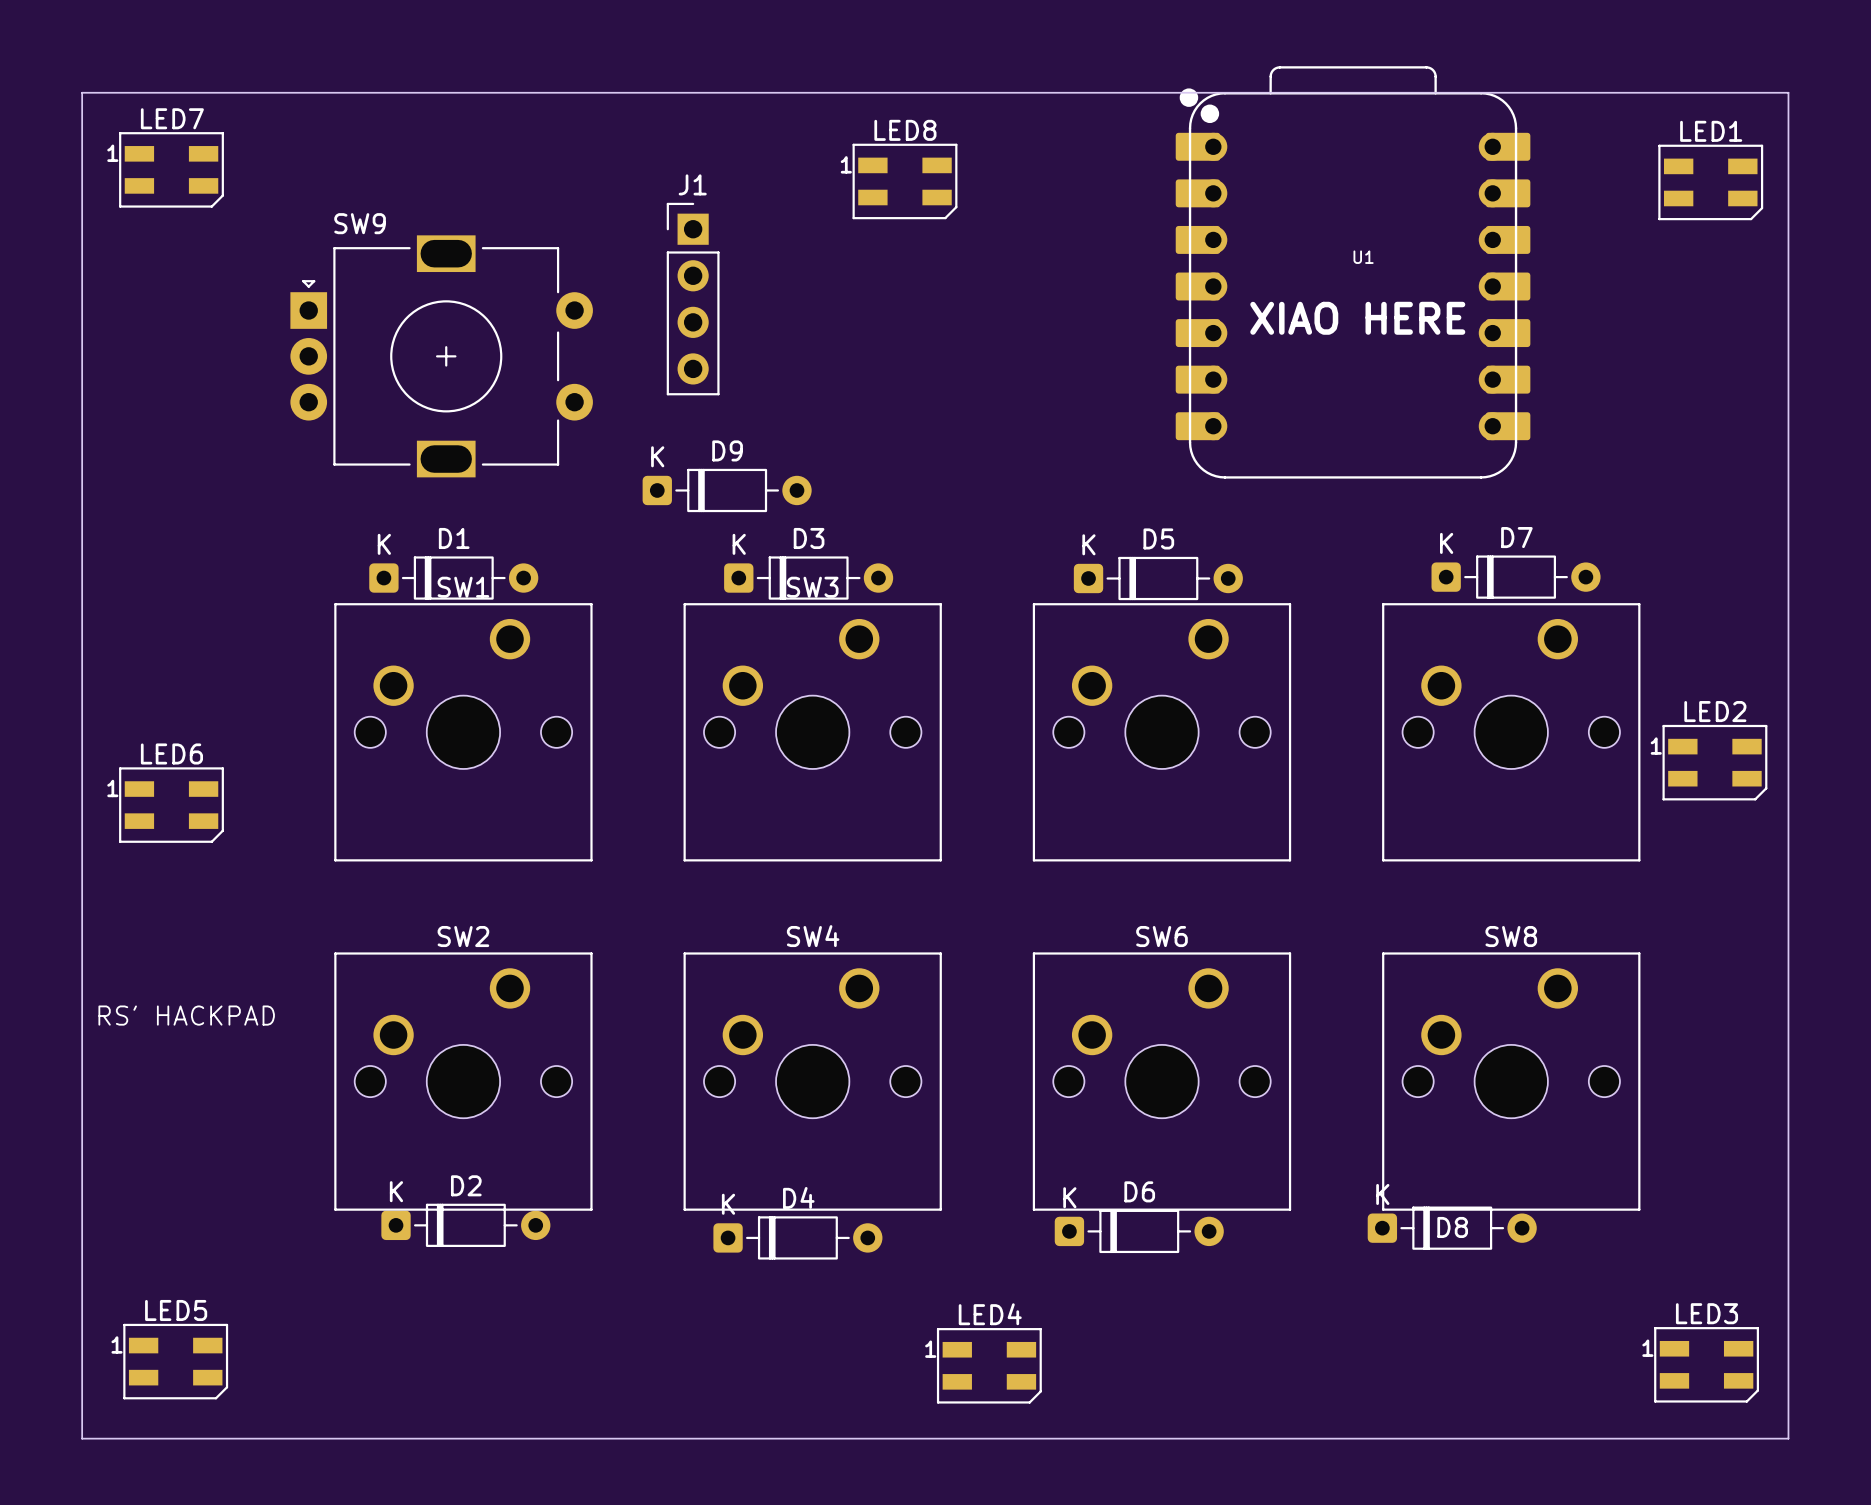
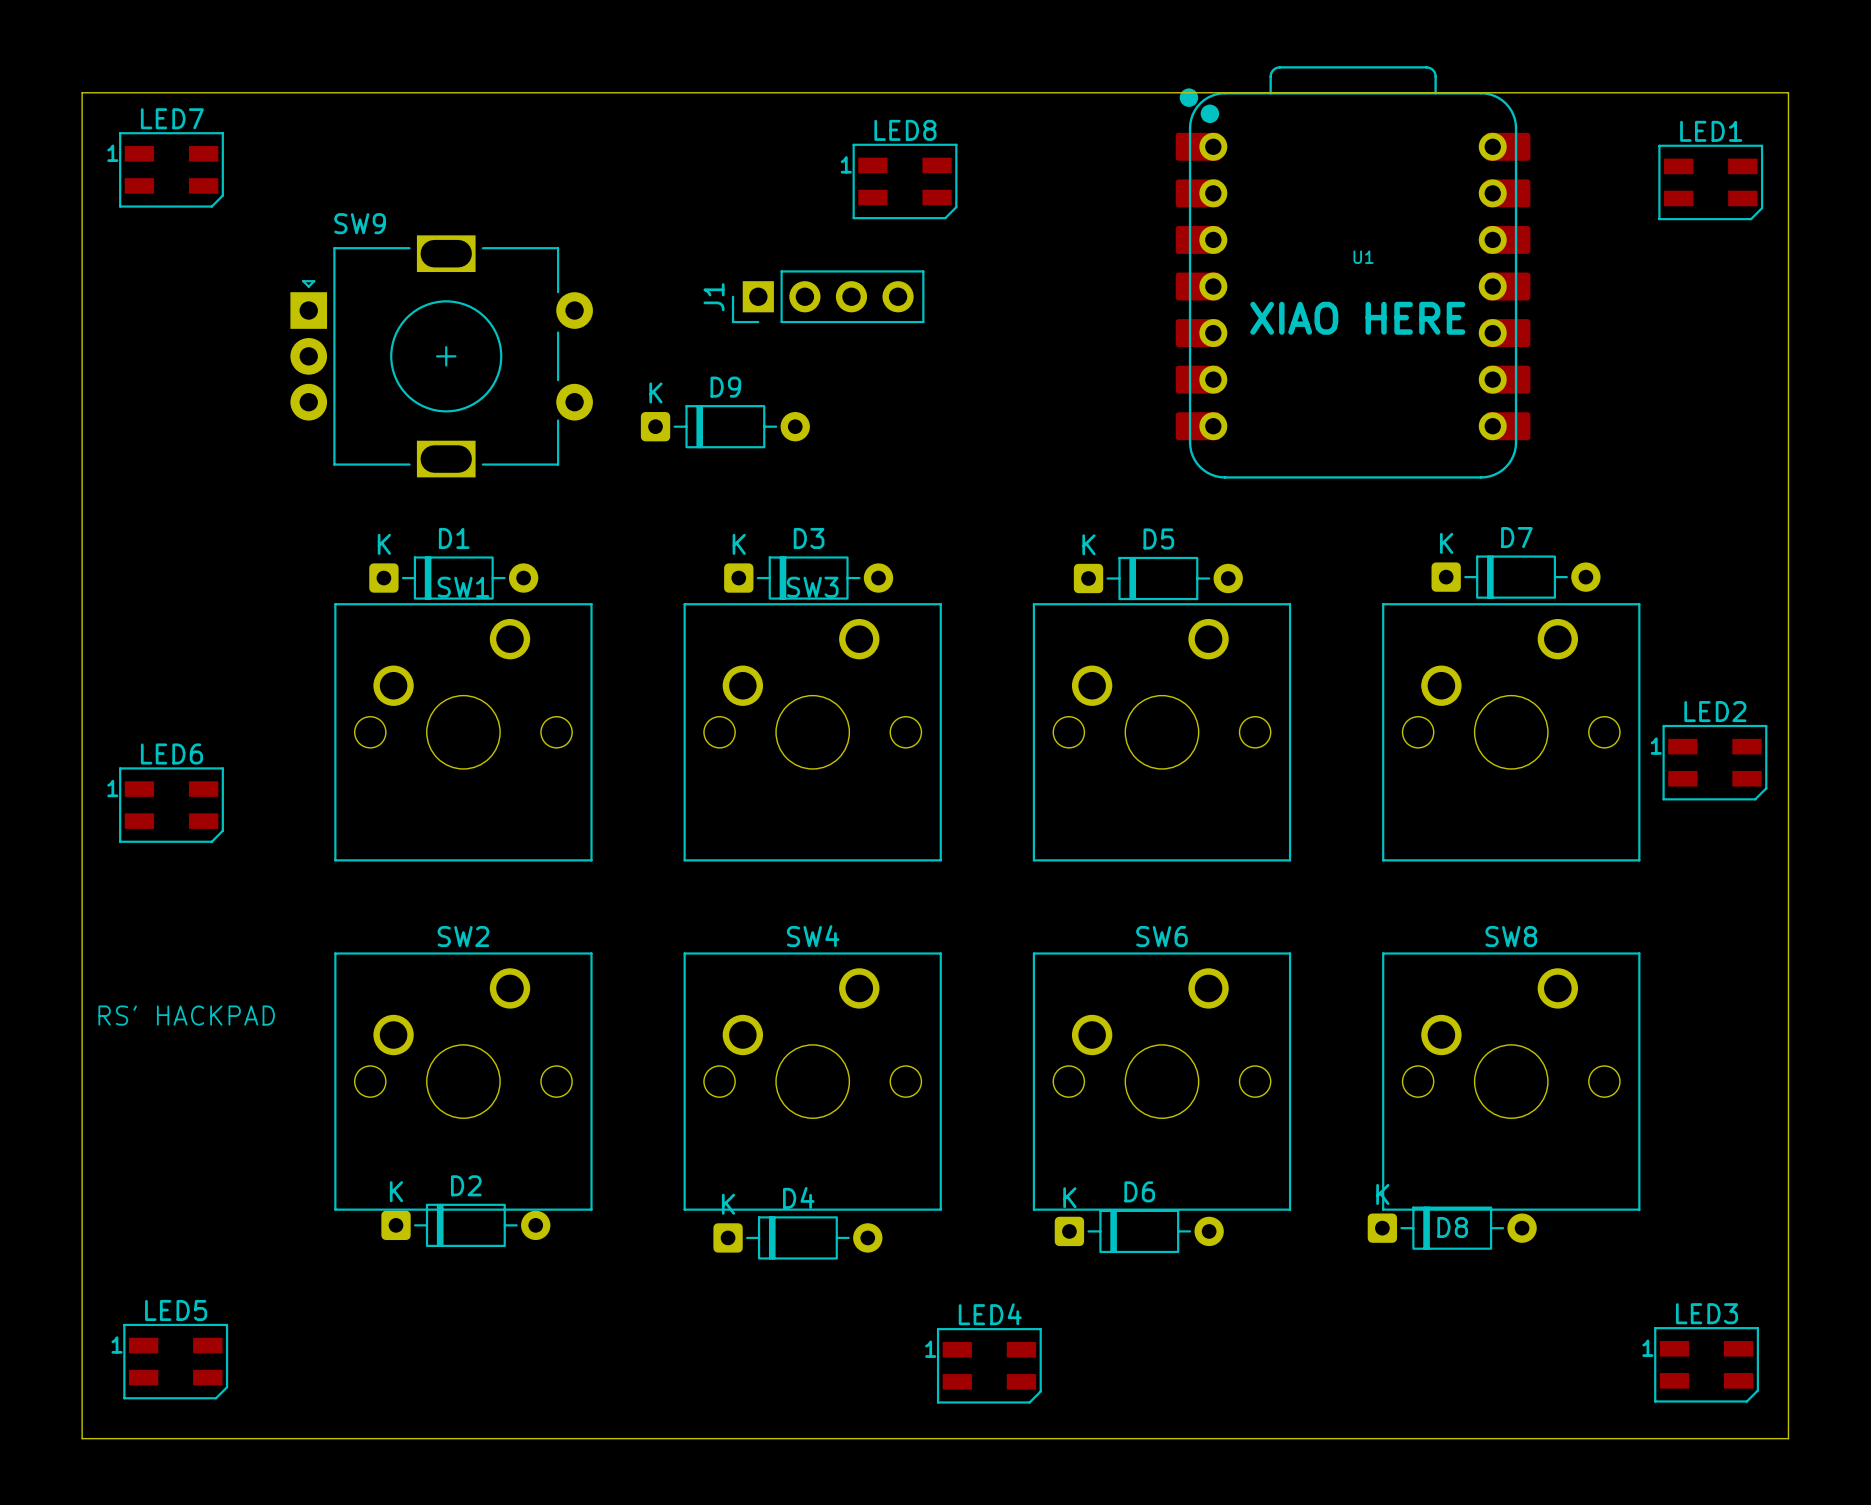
J1 rotation: 0° (693, 299) -> 90° counterclockwise (828, 296)
J1 position: (693, 299) -> (828, 296)
D9 position: (727, 490) -> (725, 426)

